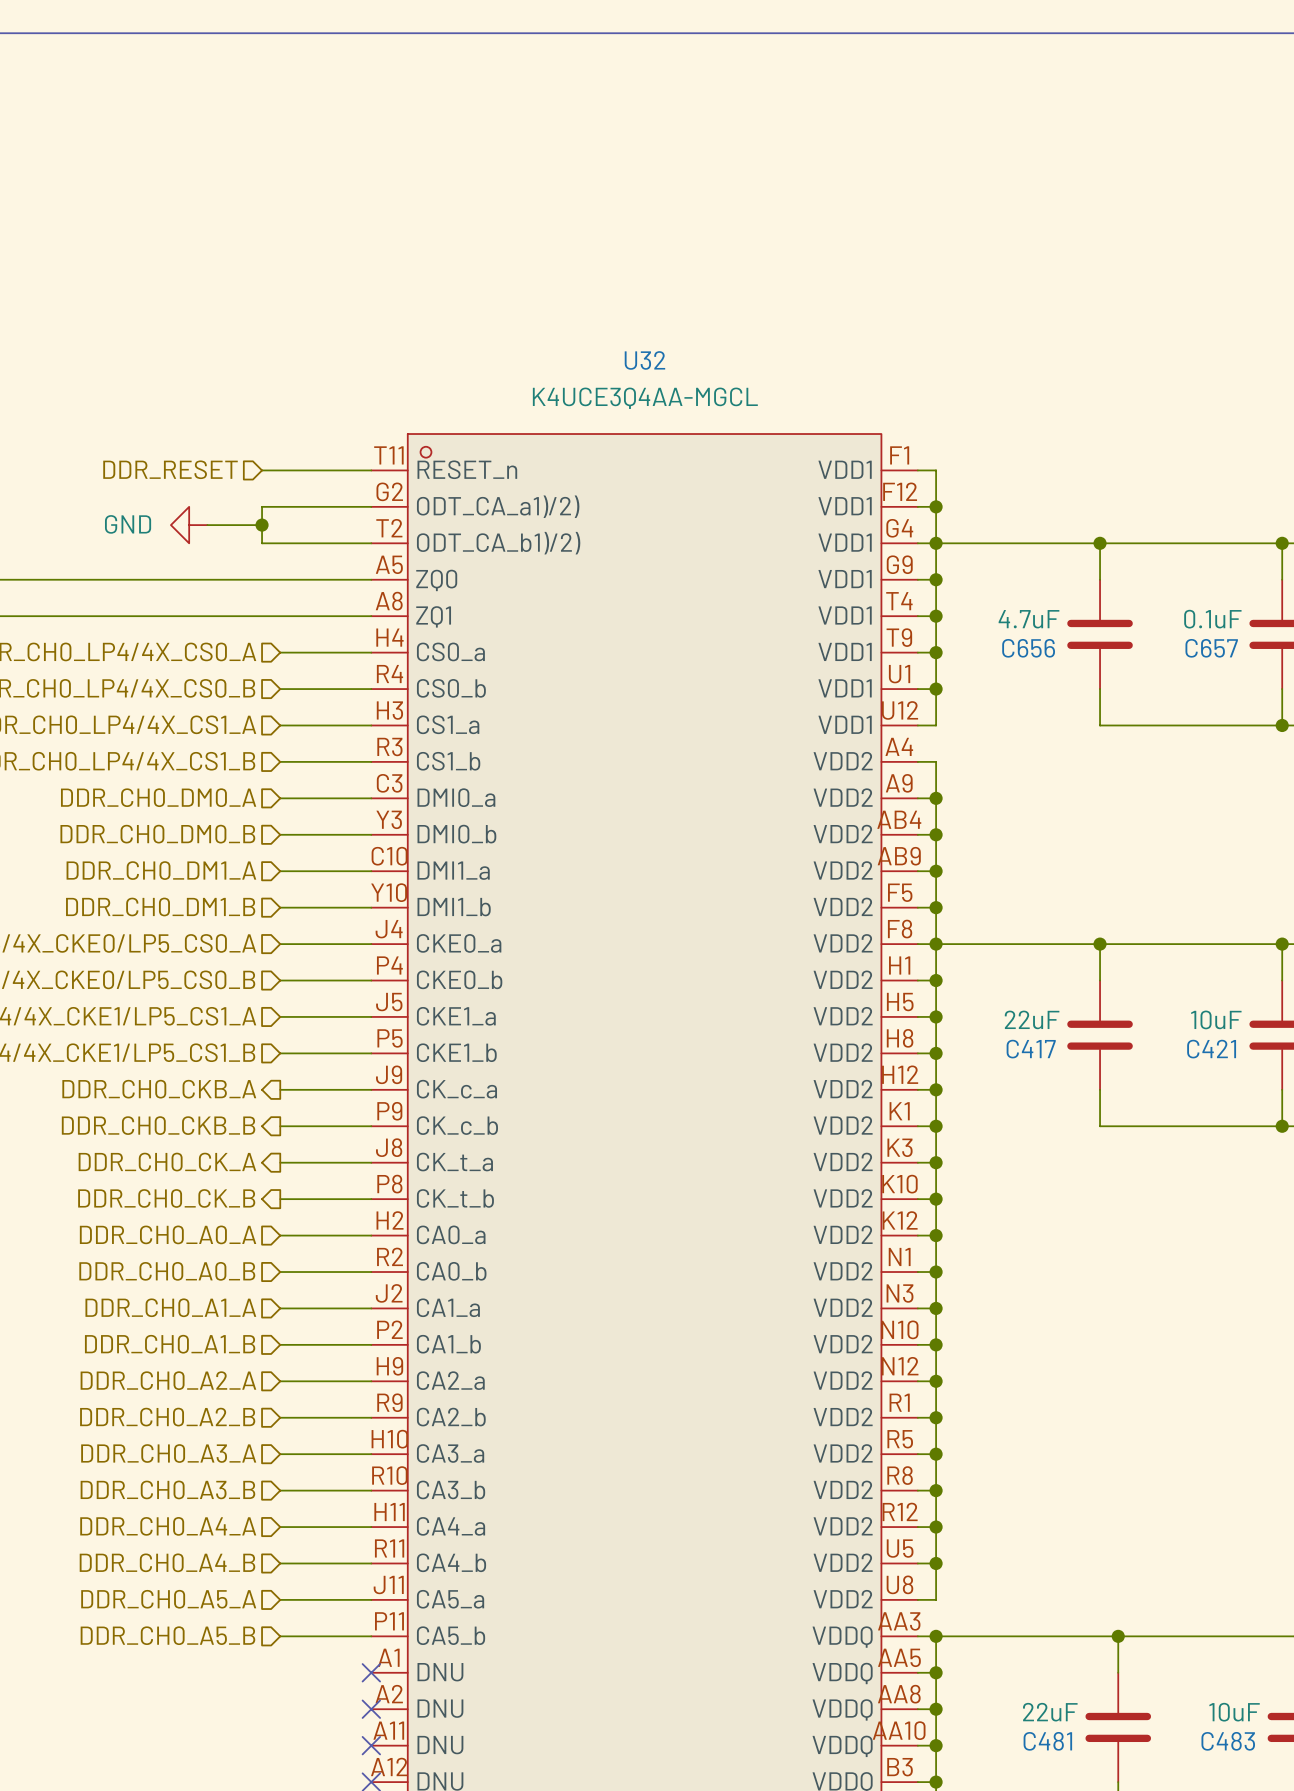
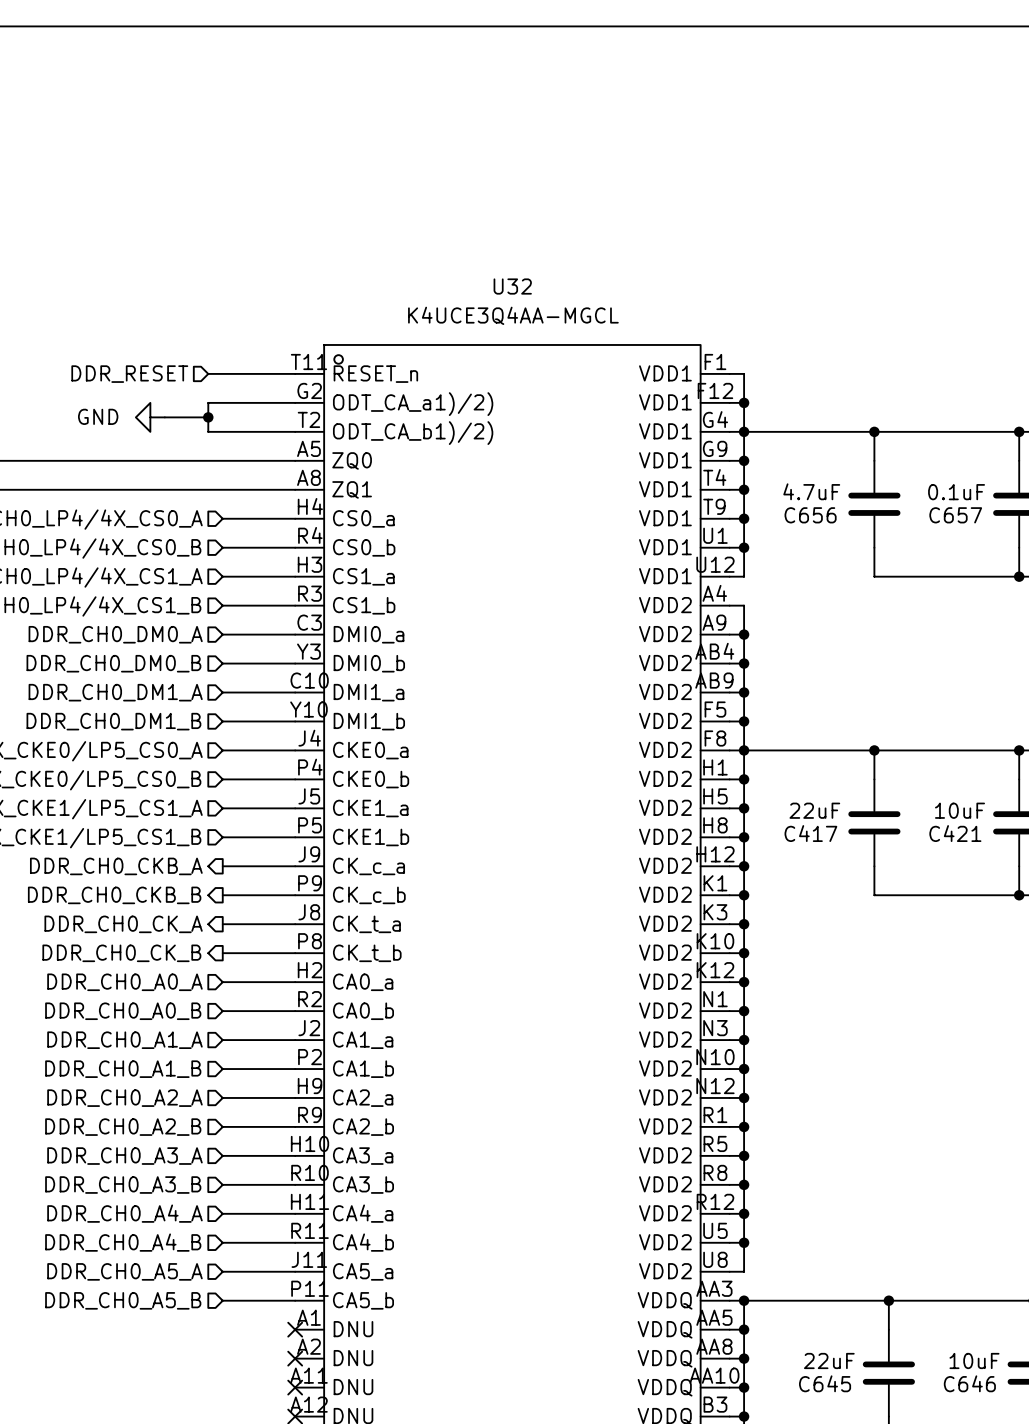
C481 name: C481 (1047, 1741) -> C645 (825, 1383)
C483 name: C483 (1228, 1741) -> C646 (969, 1383)

